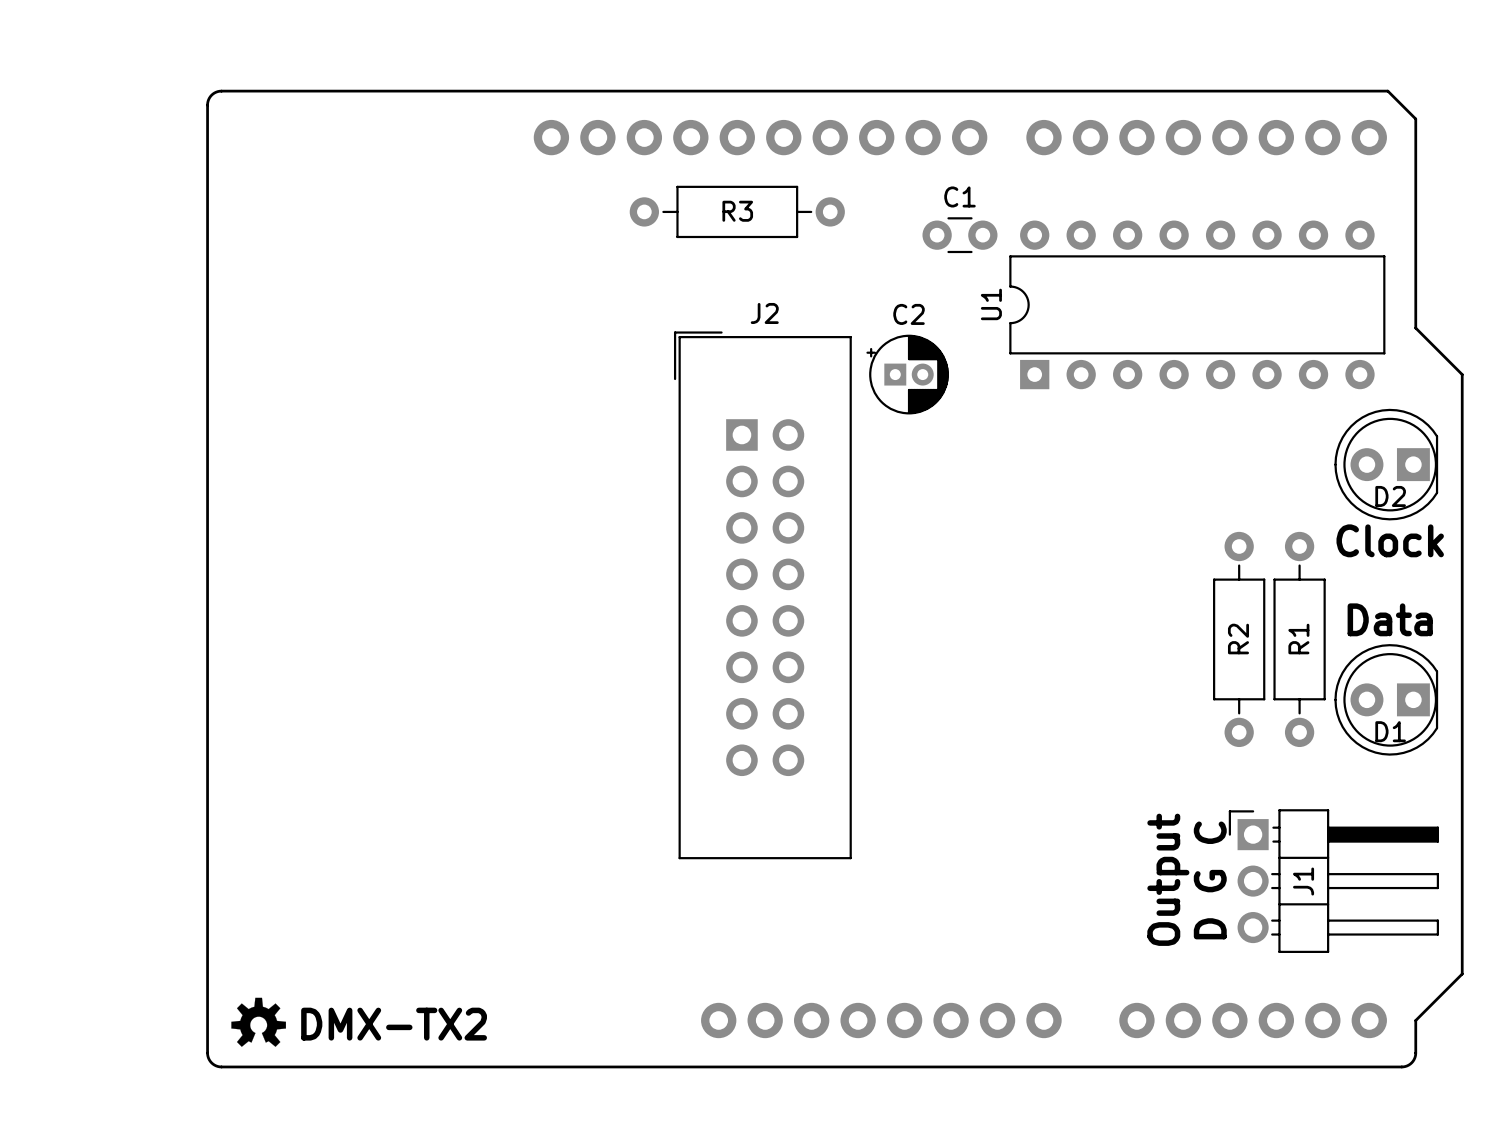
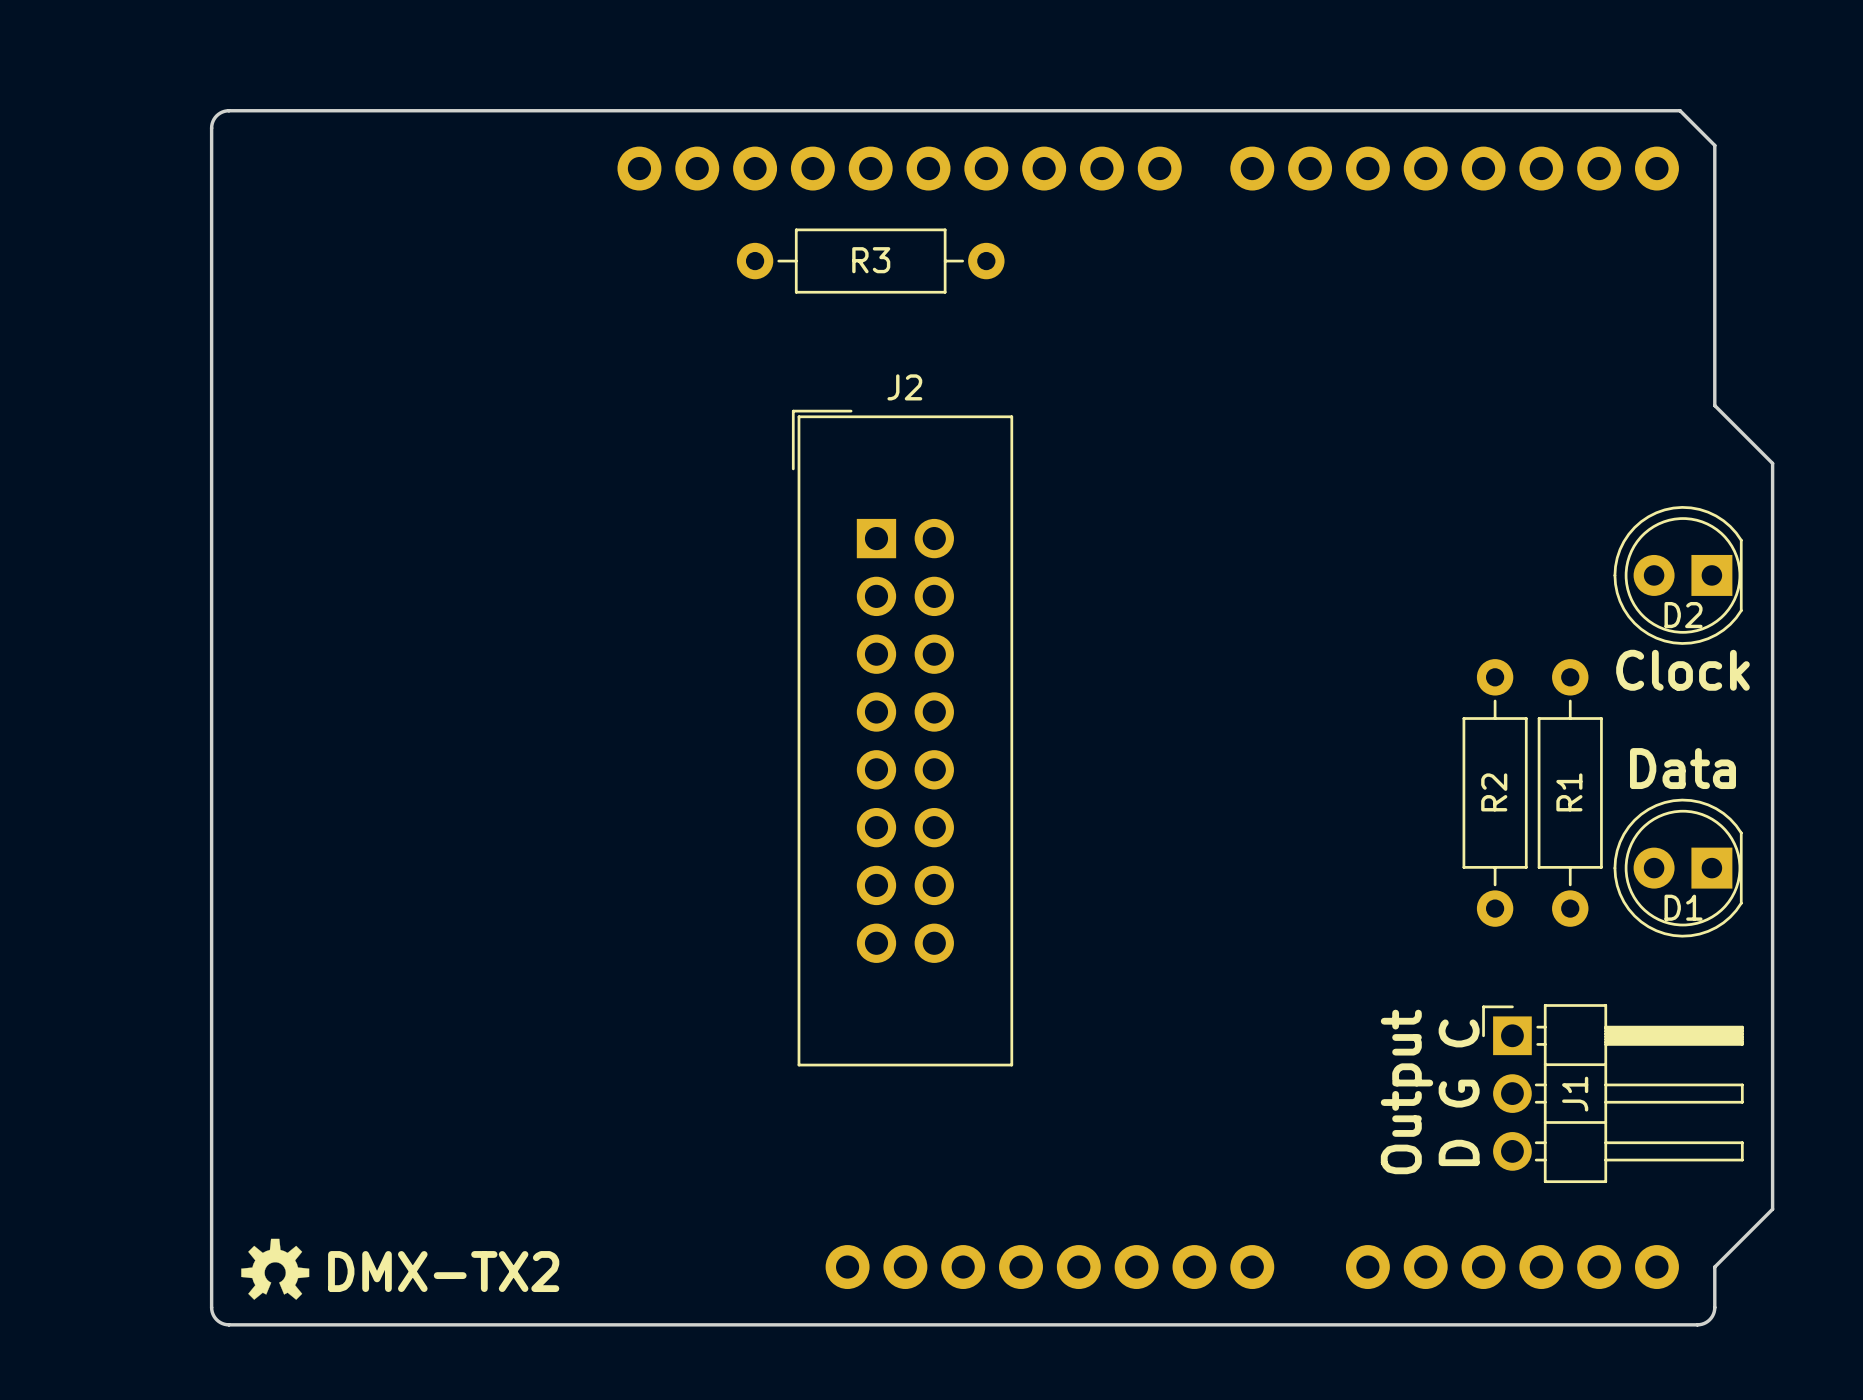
C1: (959, 235) -> none
U1: (1197, 304) -> none
C2: (907, 374) -> none

